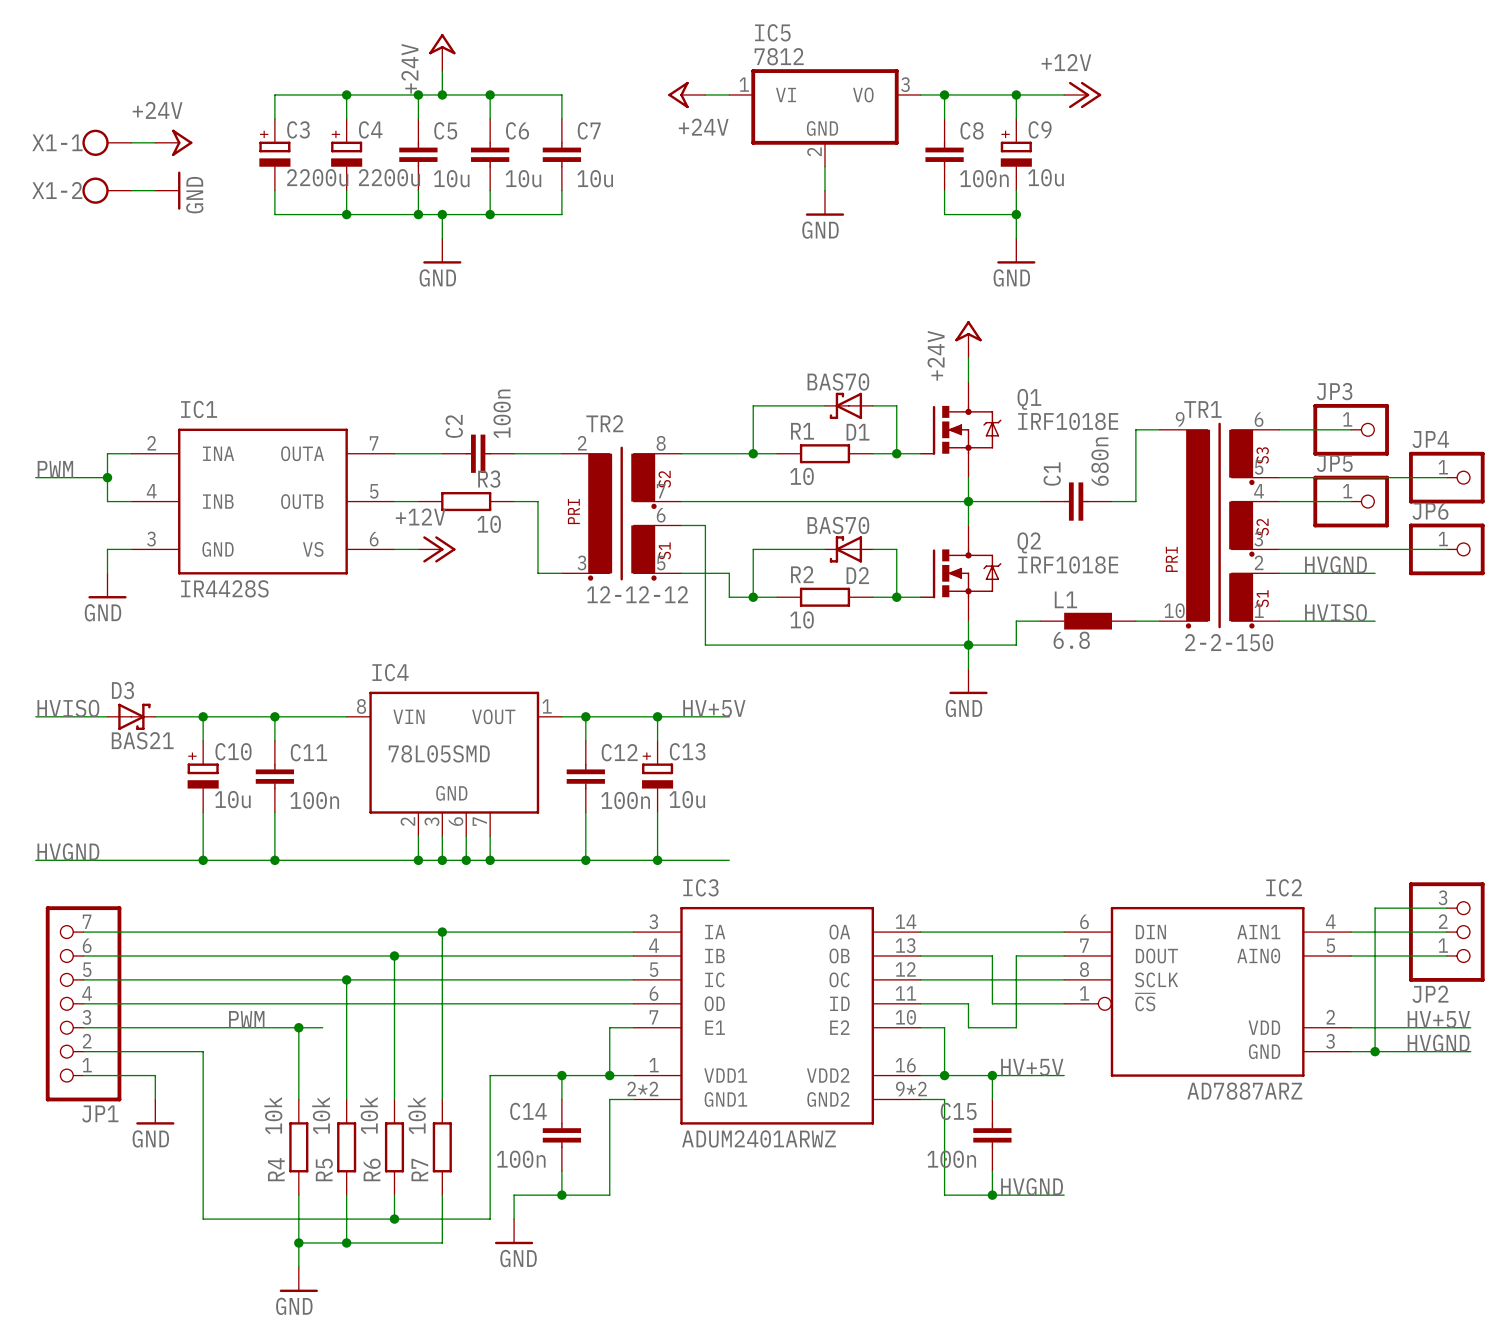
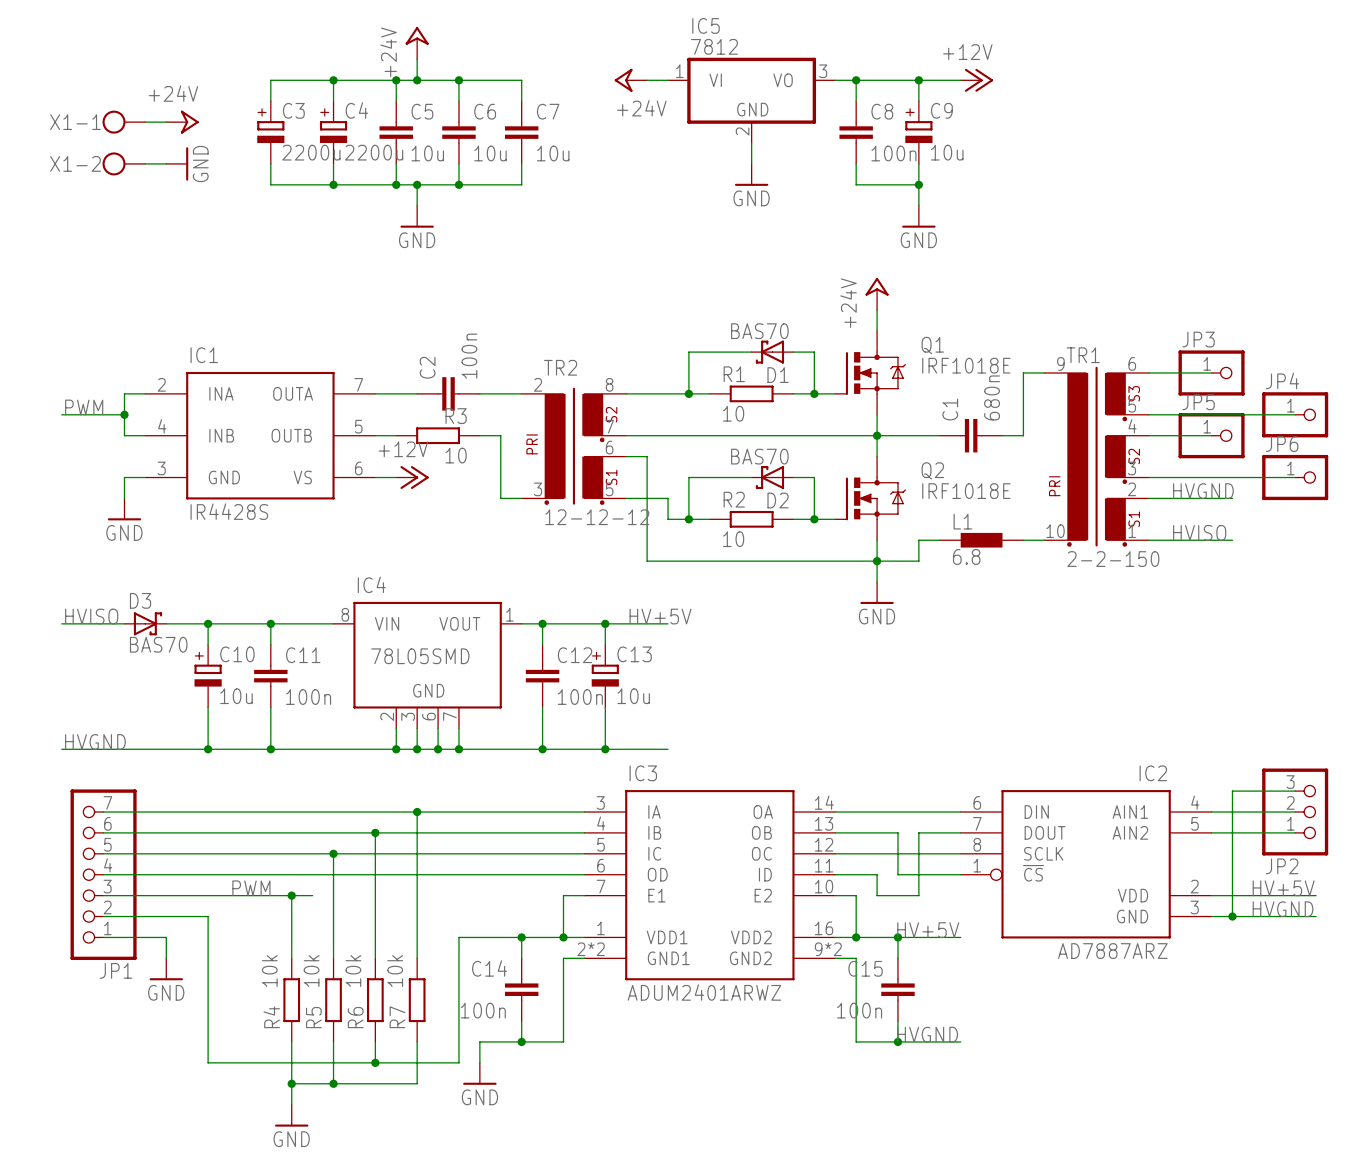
D3 value: BAS21 (142, 740) -> BAS70 (158, 644)
IC2 pin name: AIN0 (1258, 955) -> AIN2 (1130, 832)

